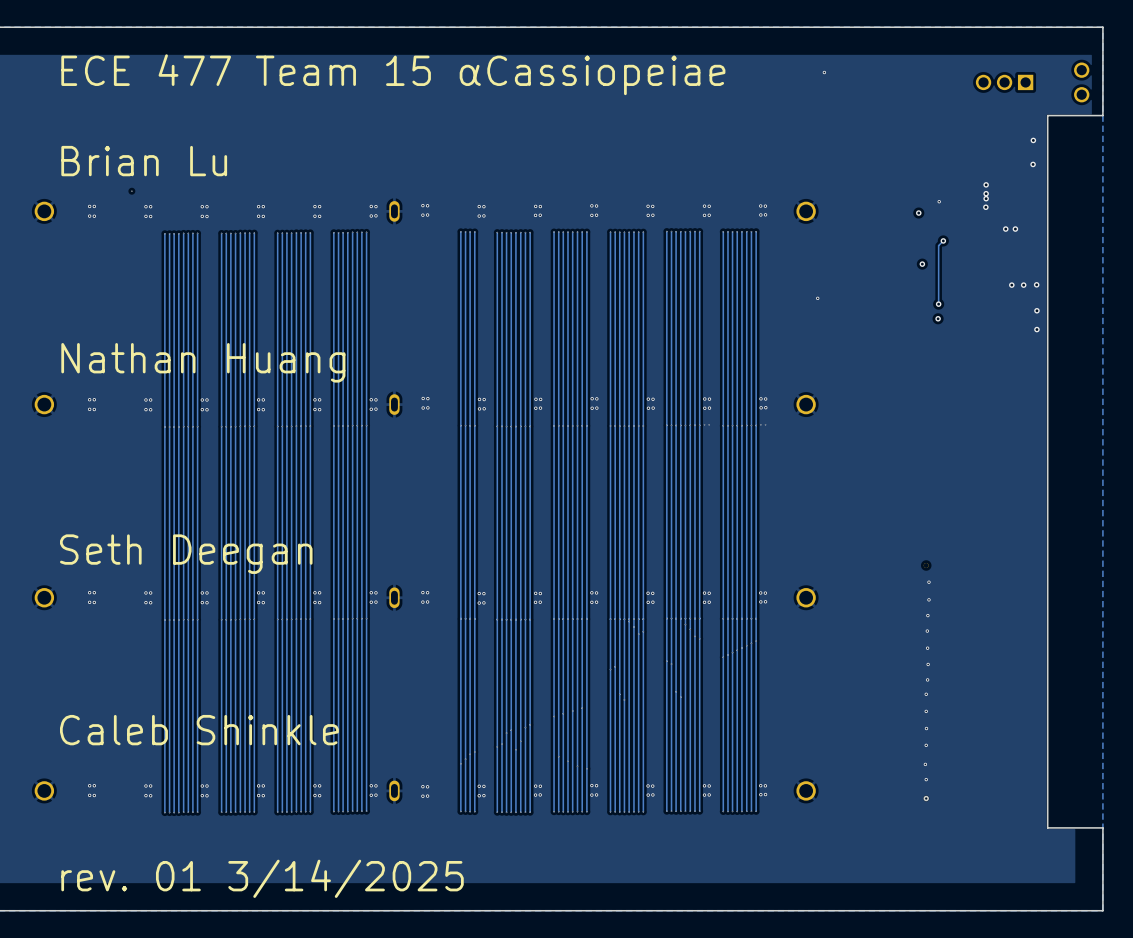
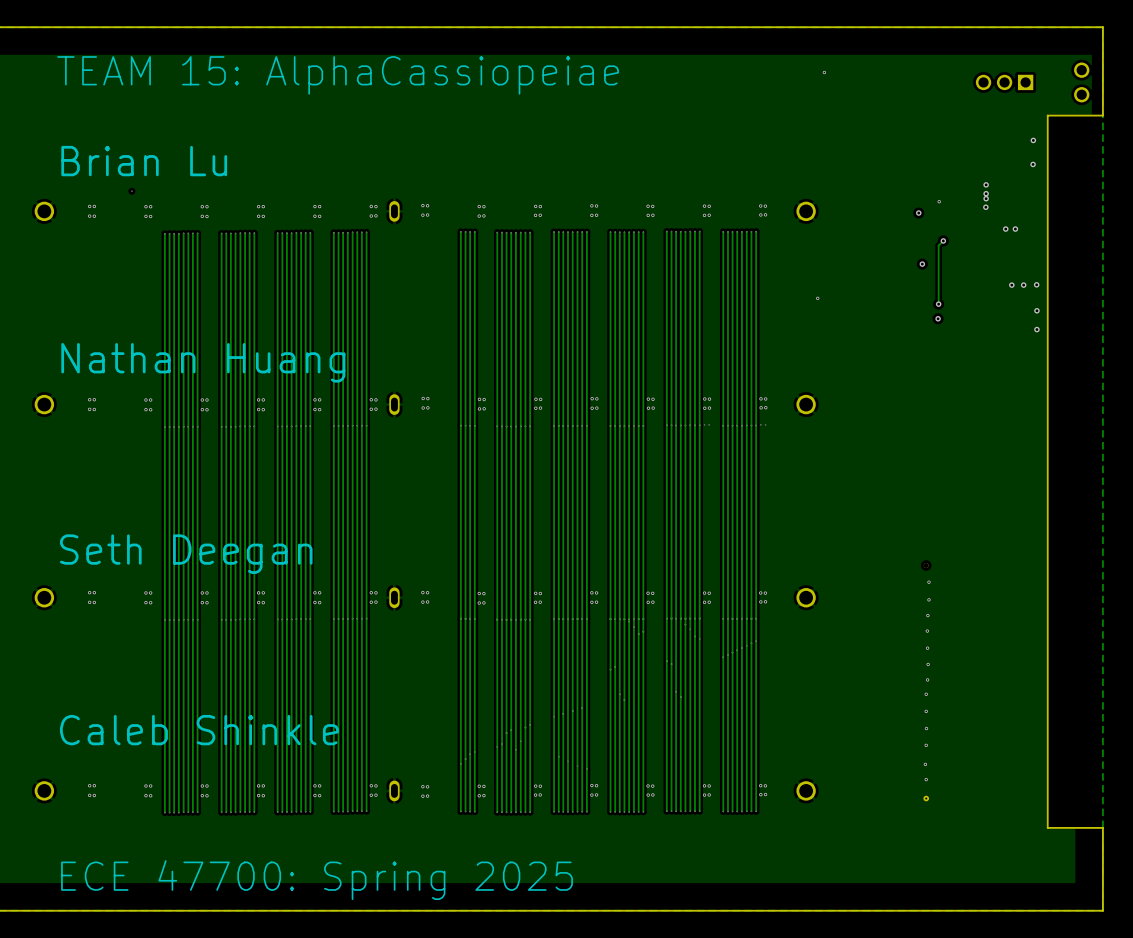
text: ECE 477 Team 15 αCassiopeiae (393, 74) -> TEAM 15: AlphaCassiopeiae (338, 75)
text: rev. 01 3/14/2025 (262, 878) -> ECE 47700: Spring 2025 (317, 880)

